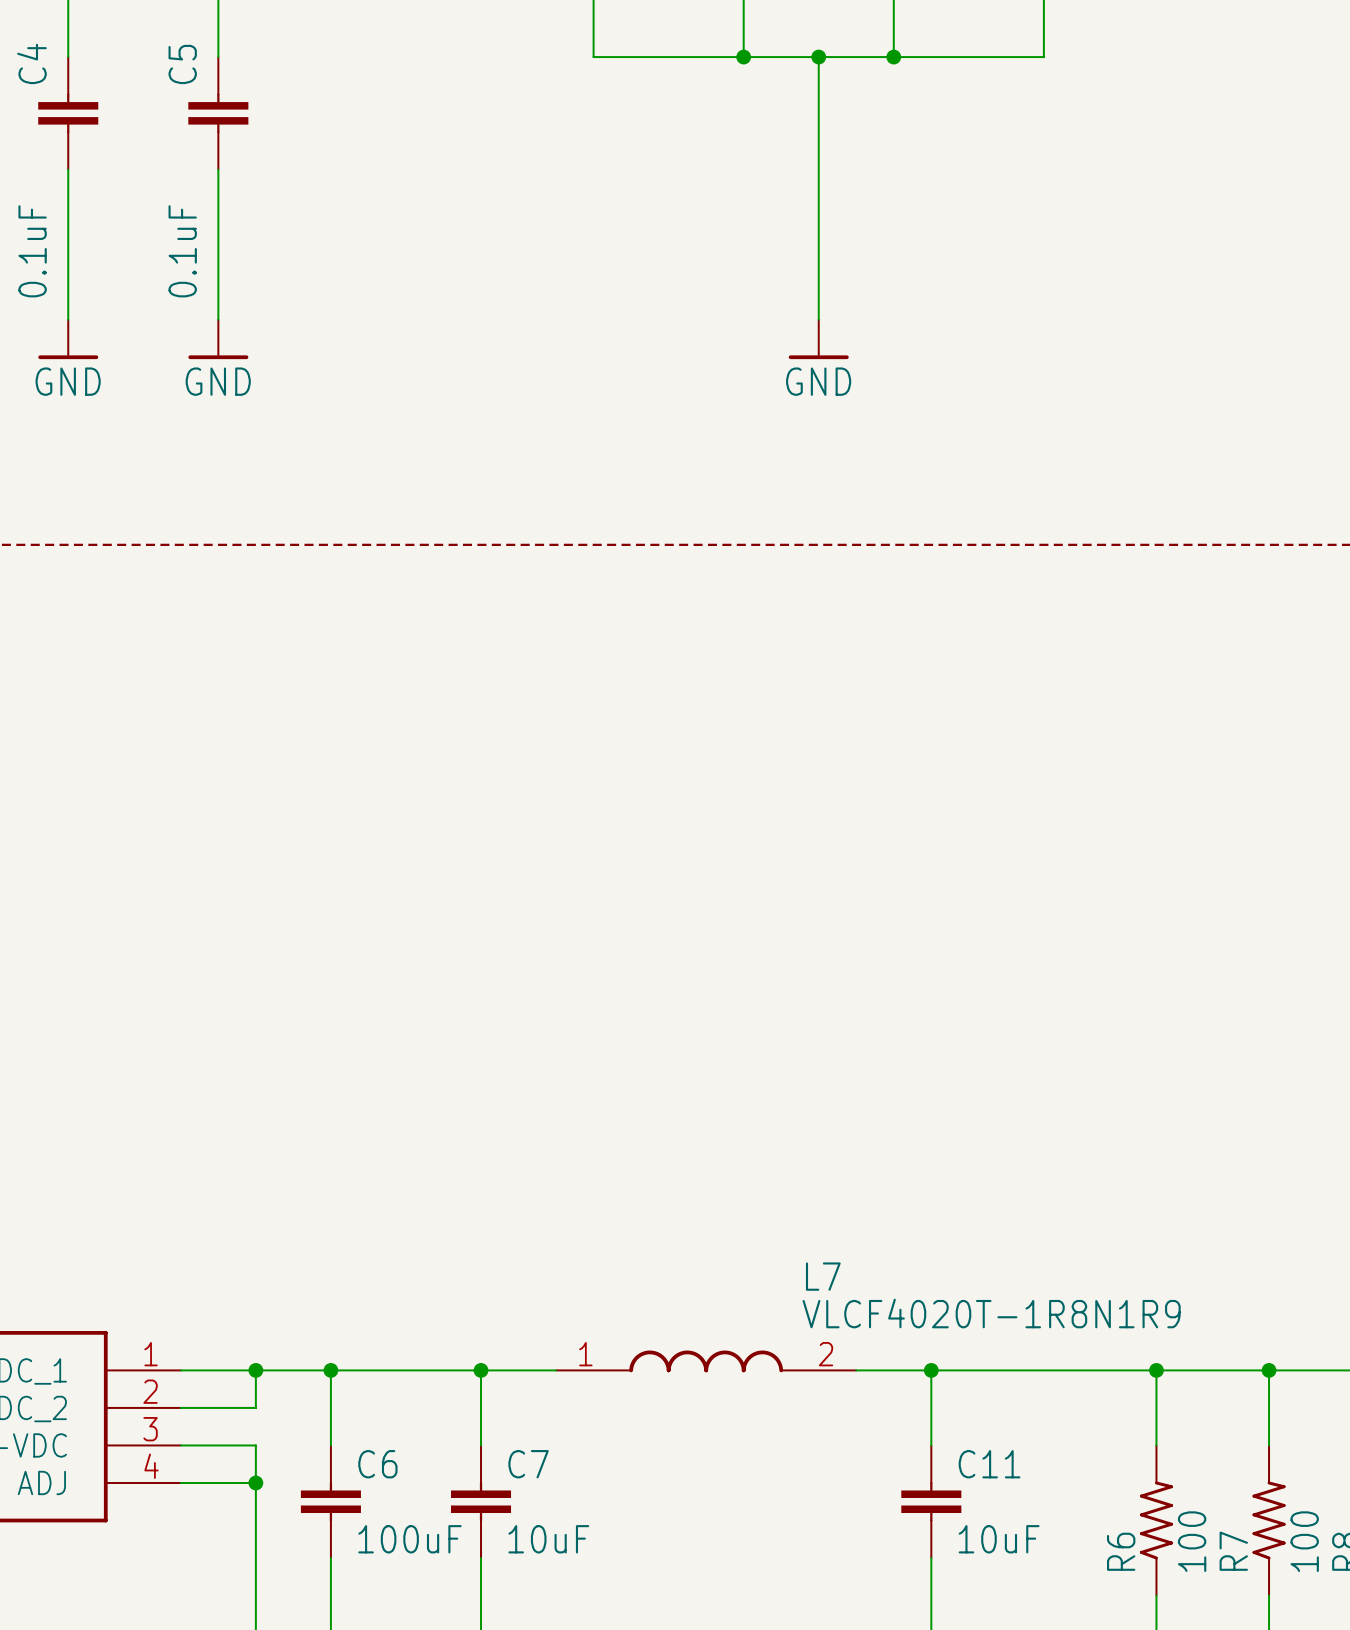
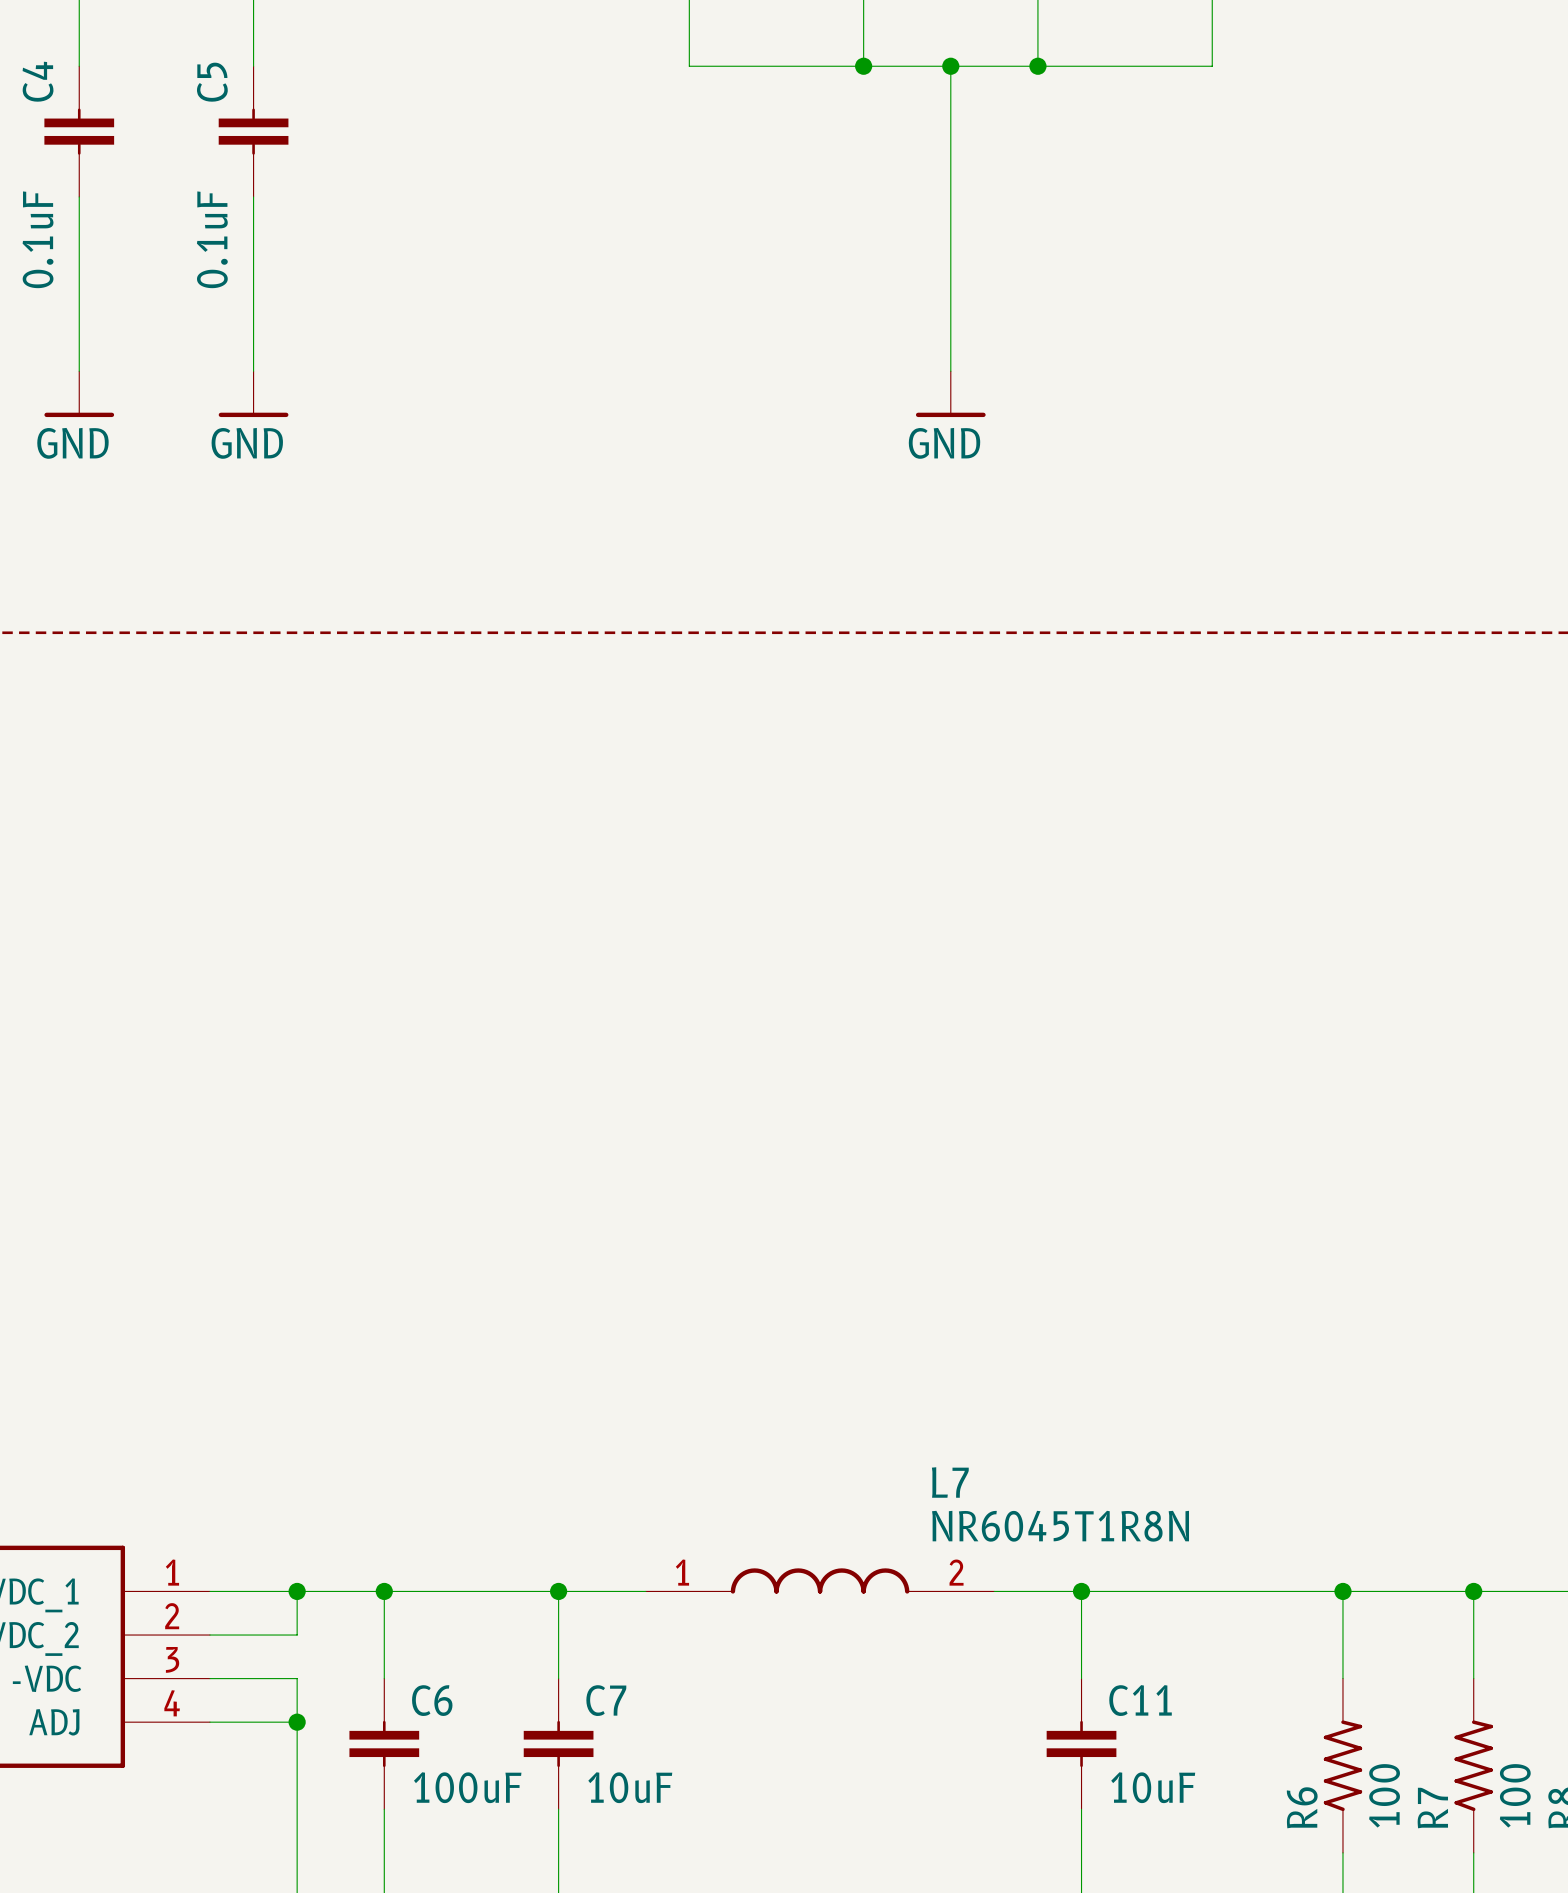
C4 value position: 0.1uF (32, 251) -> 0.1uF (38, 239)
C5 value position: 0.1uF (182, 251) -> 0.1uF (212, 239)
L7 value: VLCF4020T-1R8N1R9 (991, 1313) -> NR6045T1R8N (1060, 1526)

